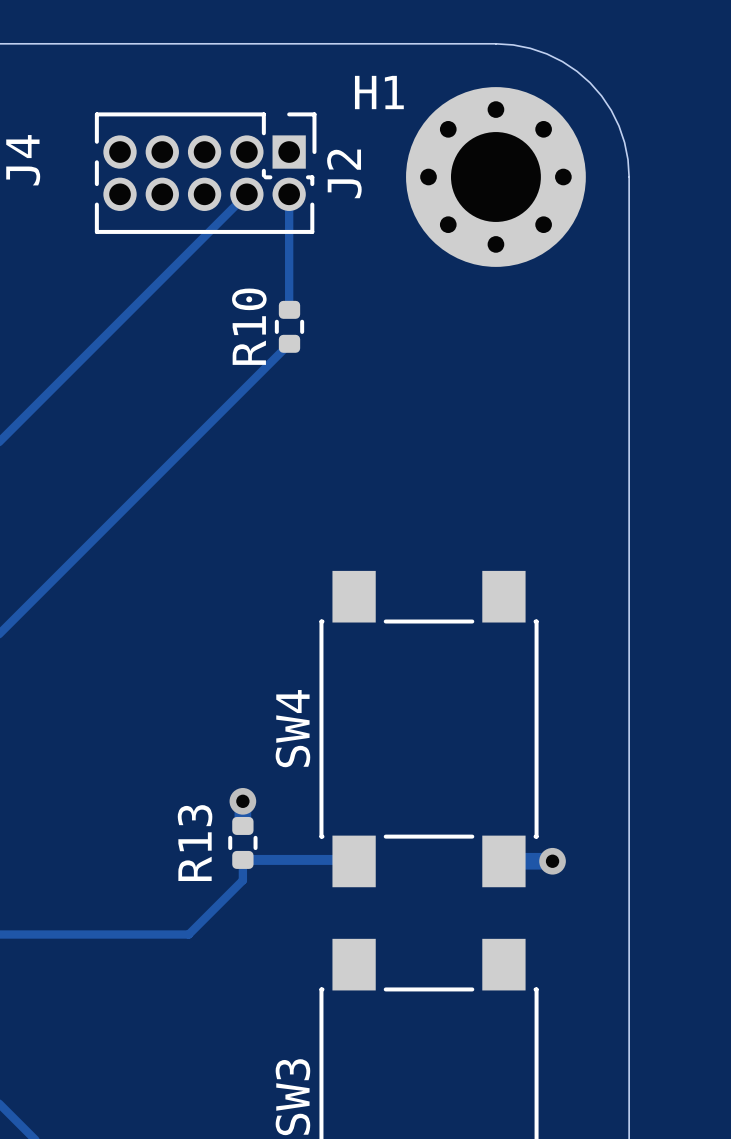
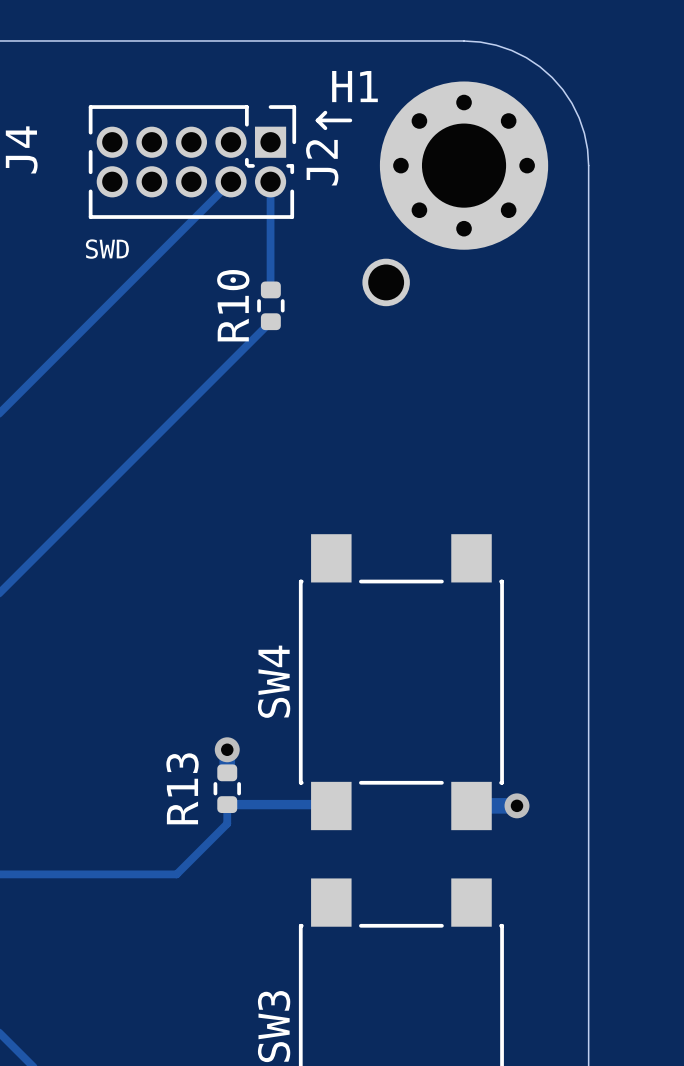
line: none -> (325, 112) (317, 120)
line: none -> (317, 120) (325, 128)
line: none -> (317, 120) (350, 120)
text: none -> SWD (107, 249)
part: none -> (386, 282)

